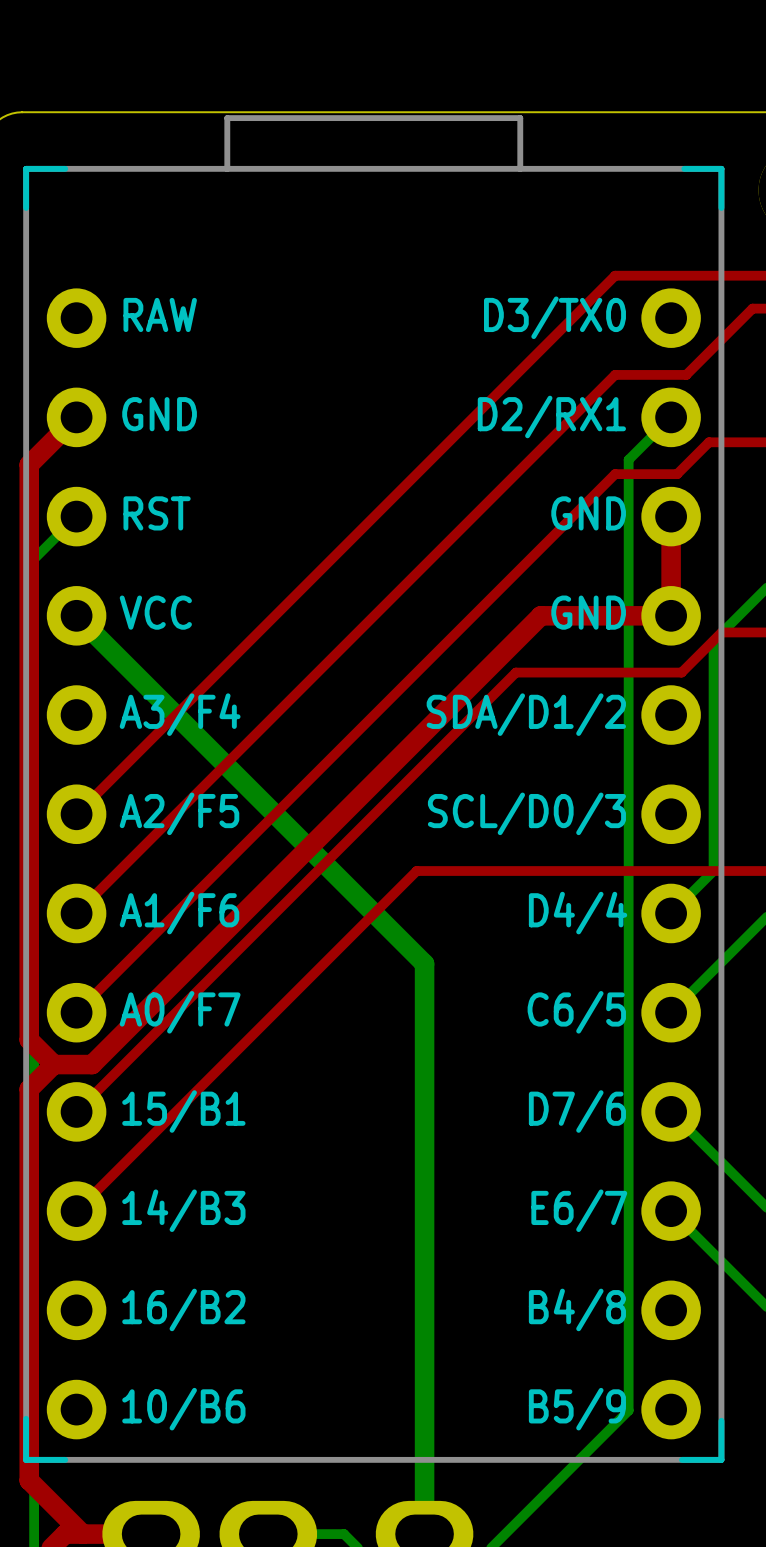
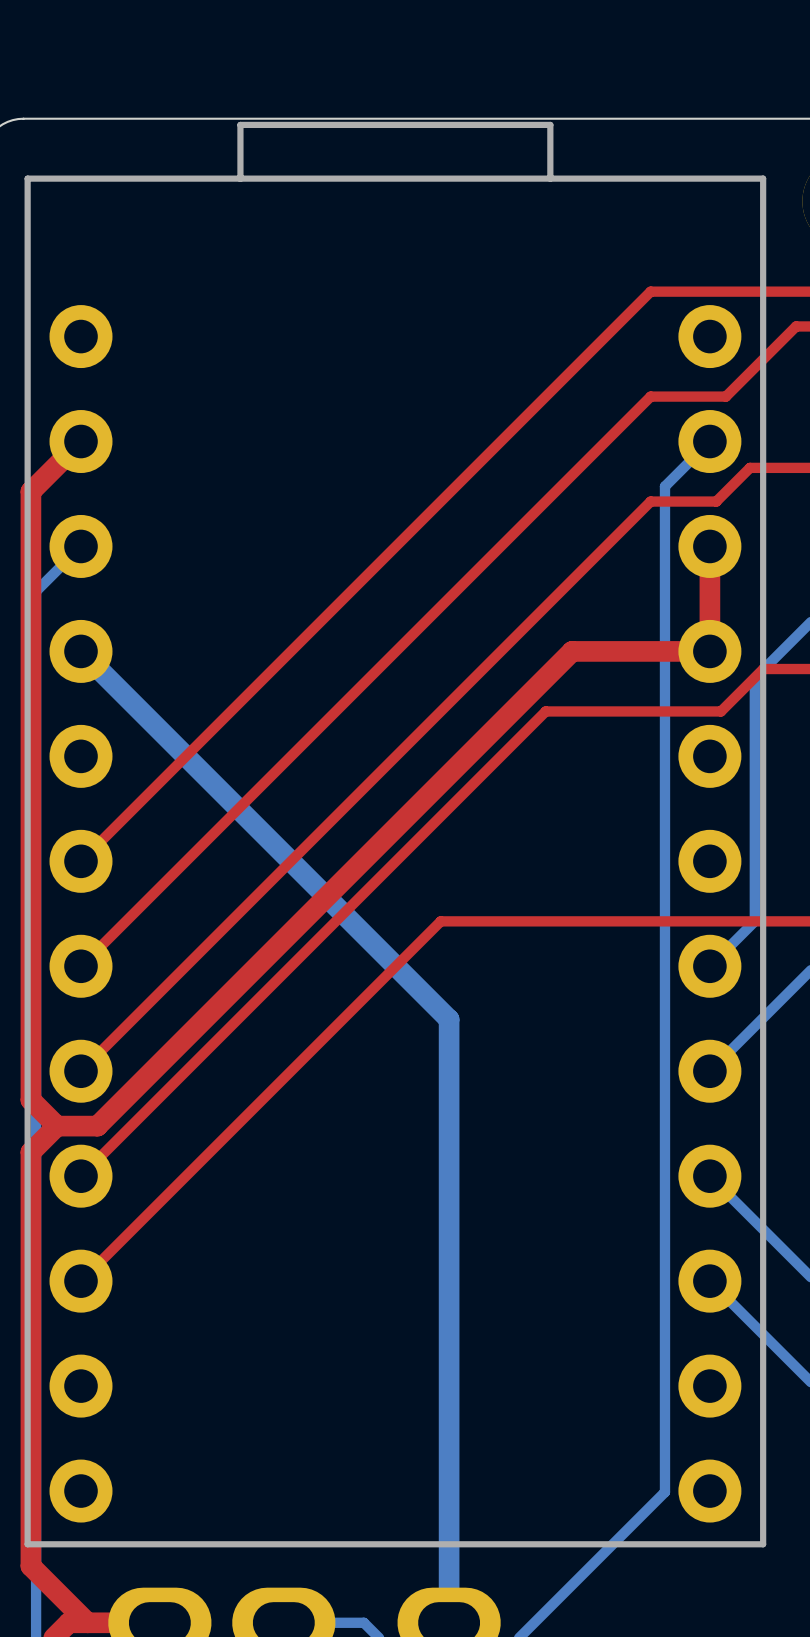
part footprint: [23, 115, 725, 1463] -> [24, 121, 767, 1548]

